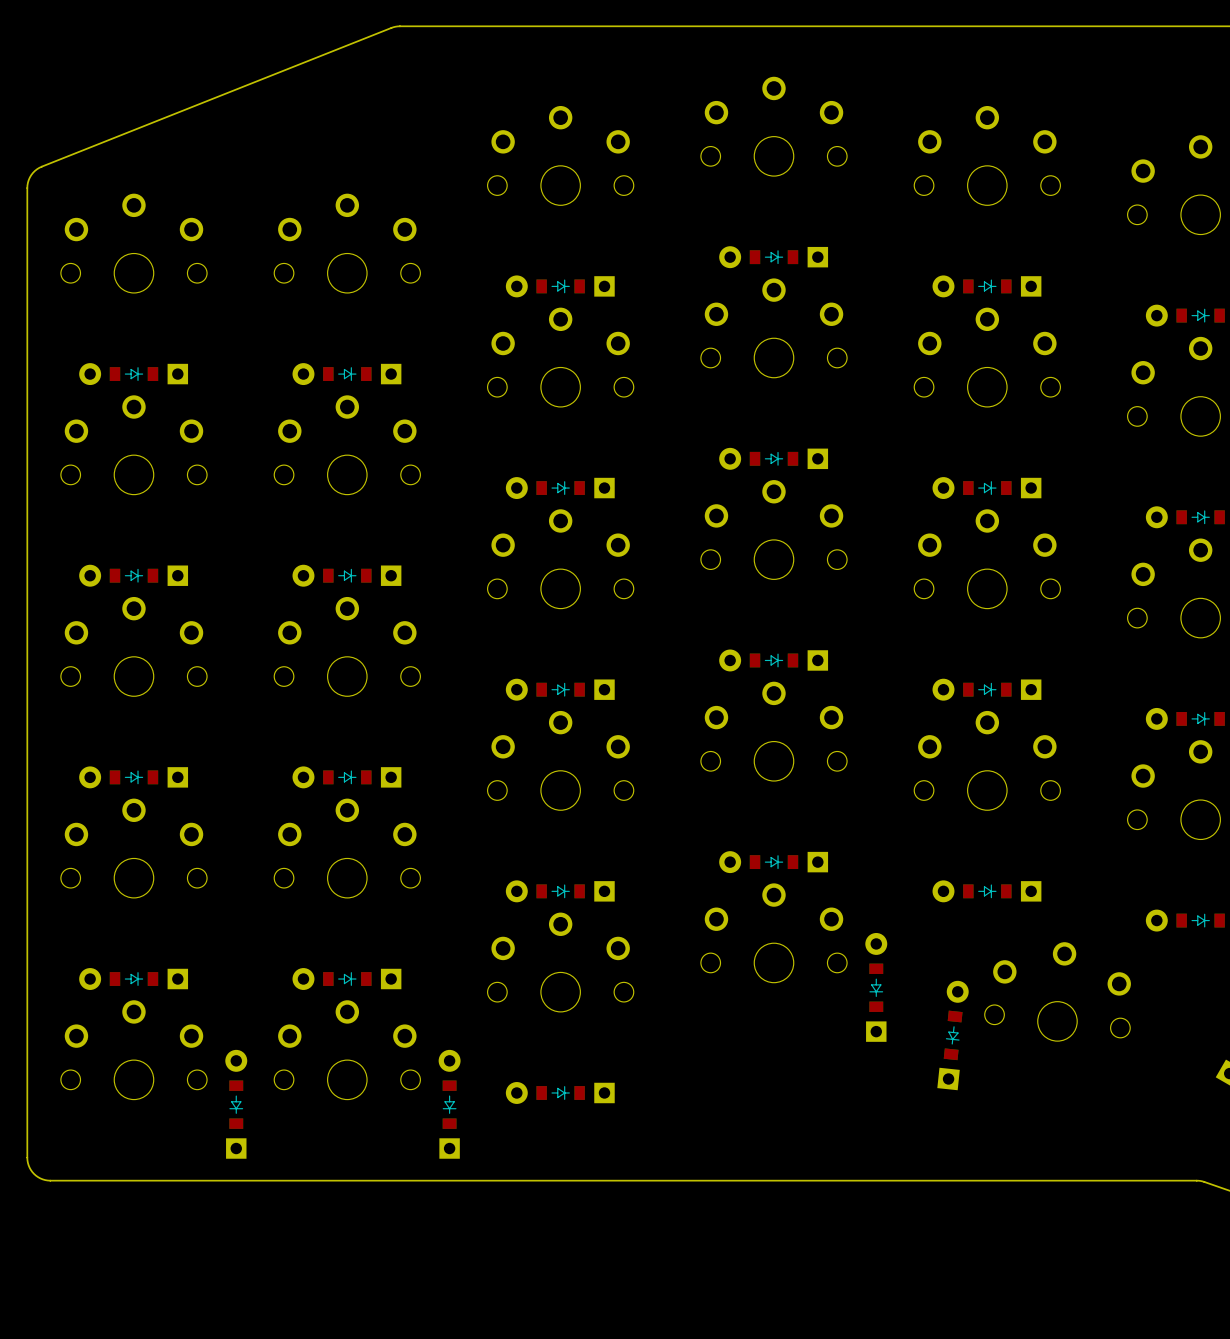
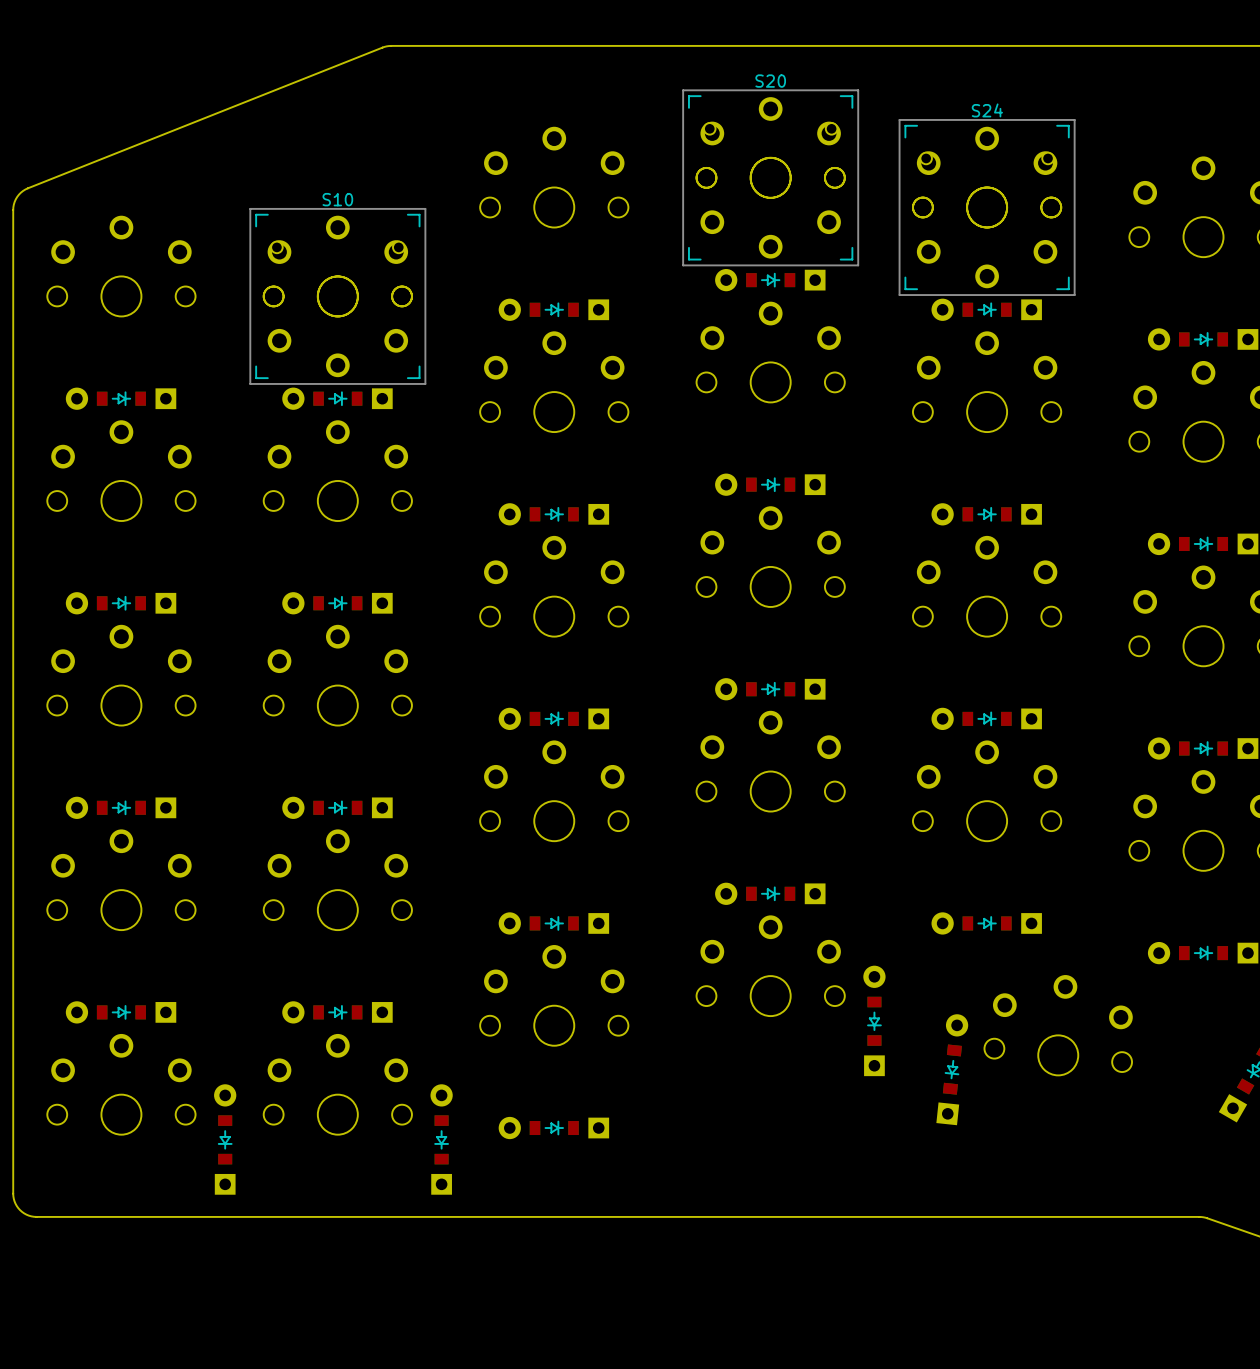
S20: none -> (770, 177)
S24: none -> (987, 207)
S10: none -> (337, 296)

